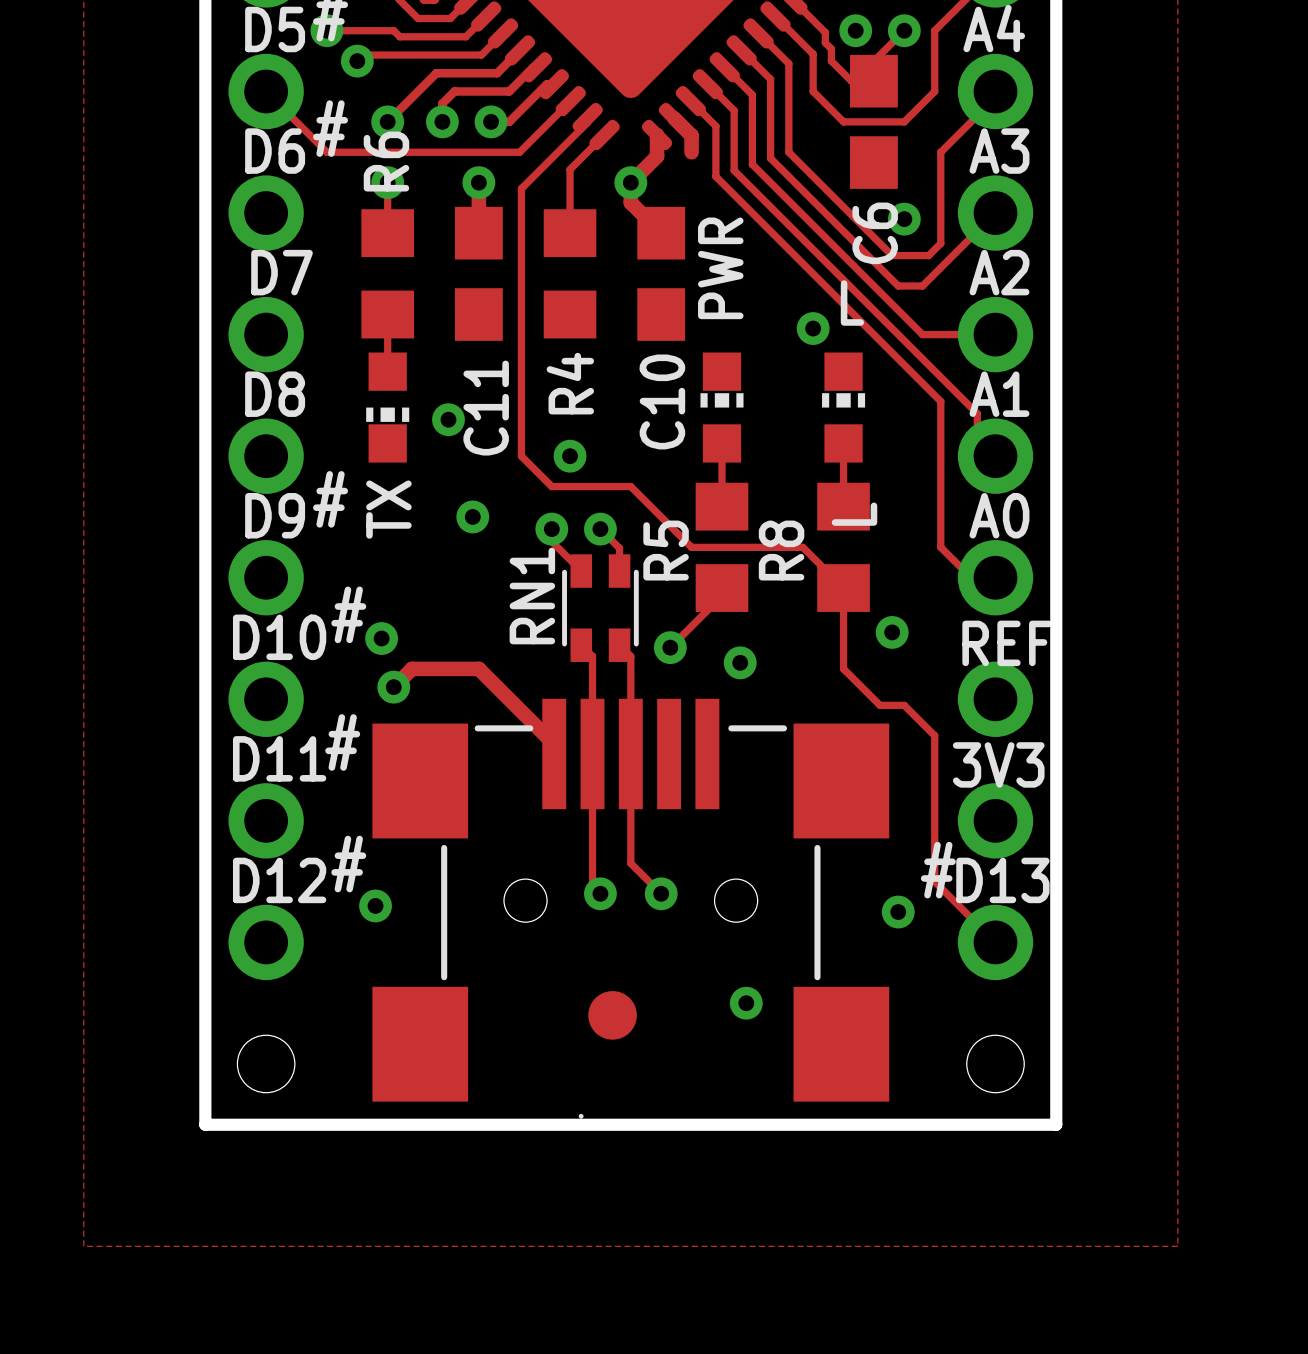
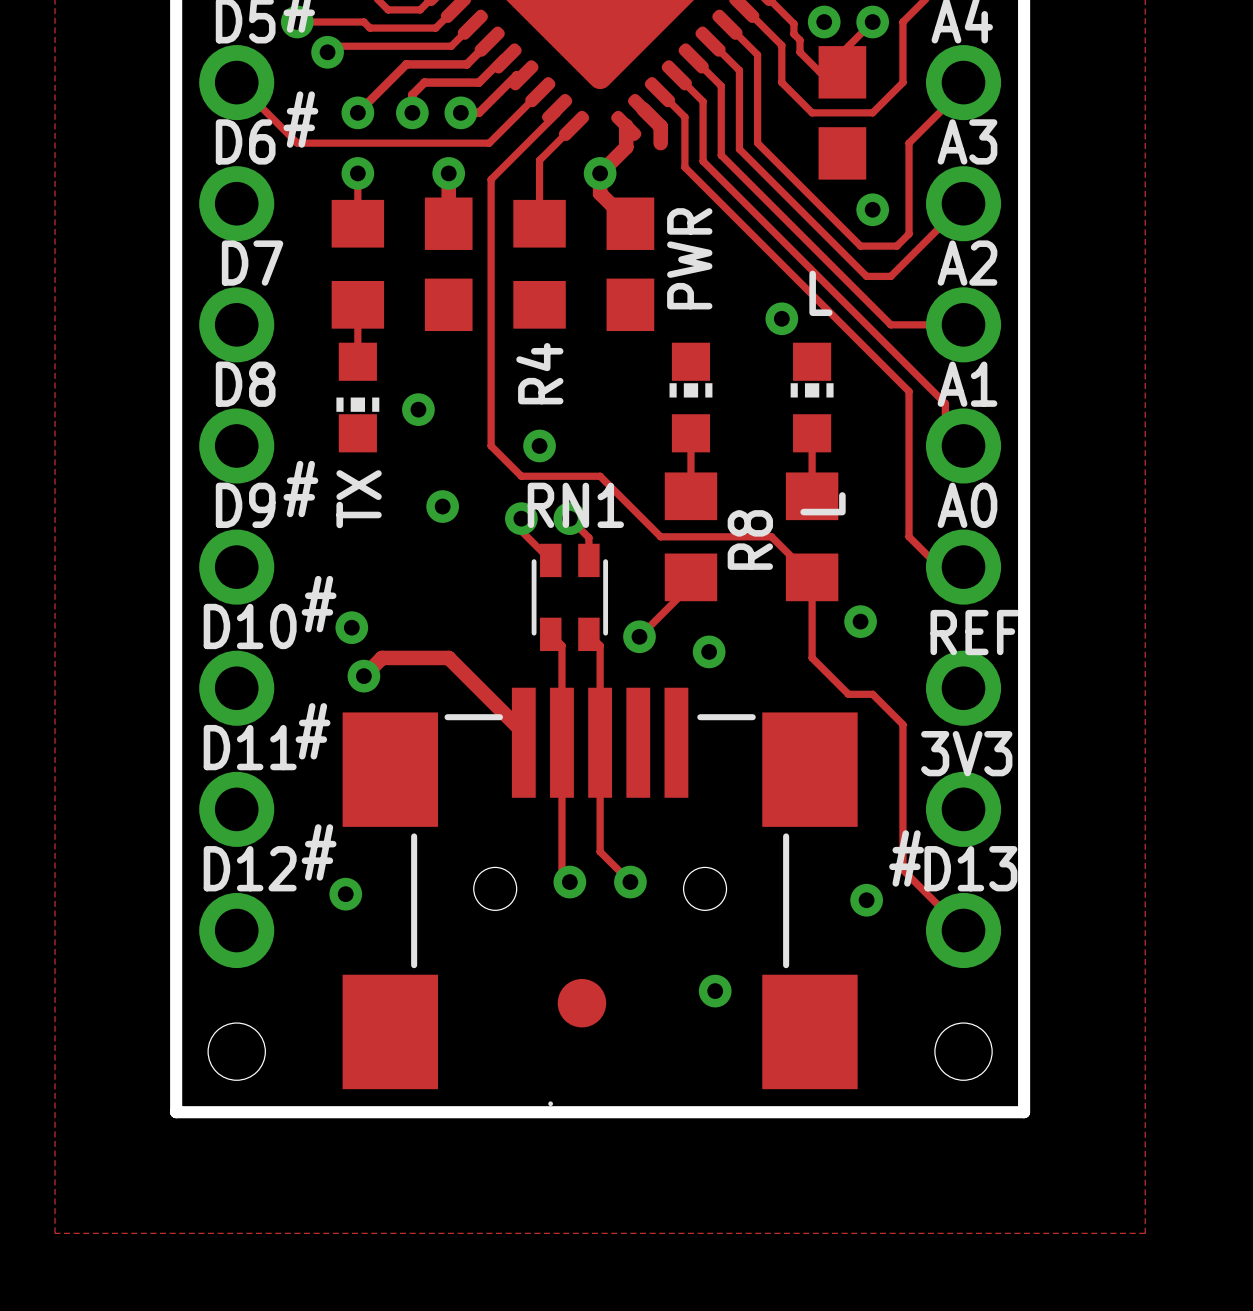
R6 name: R6 (386, 161) -> none
C6 name: C6 (875, 233) -> none
C10 name: C10 (662, 401) -> none
C11 name: C11 (486, 408) -> none
R5 name: R5 (666, 550) -> none
RN1 name rotation: 0° (532, 596) -> 90° clockwise (575, 505)

